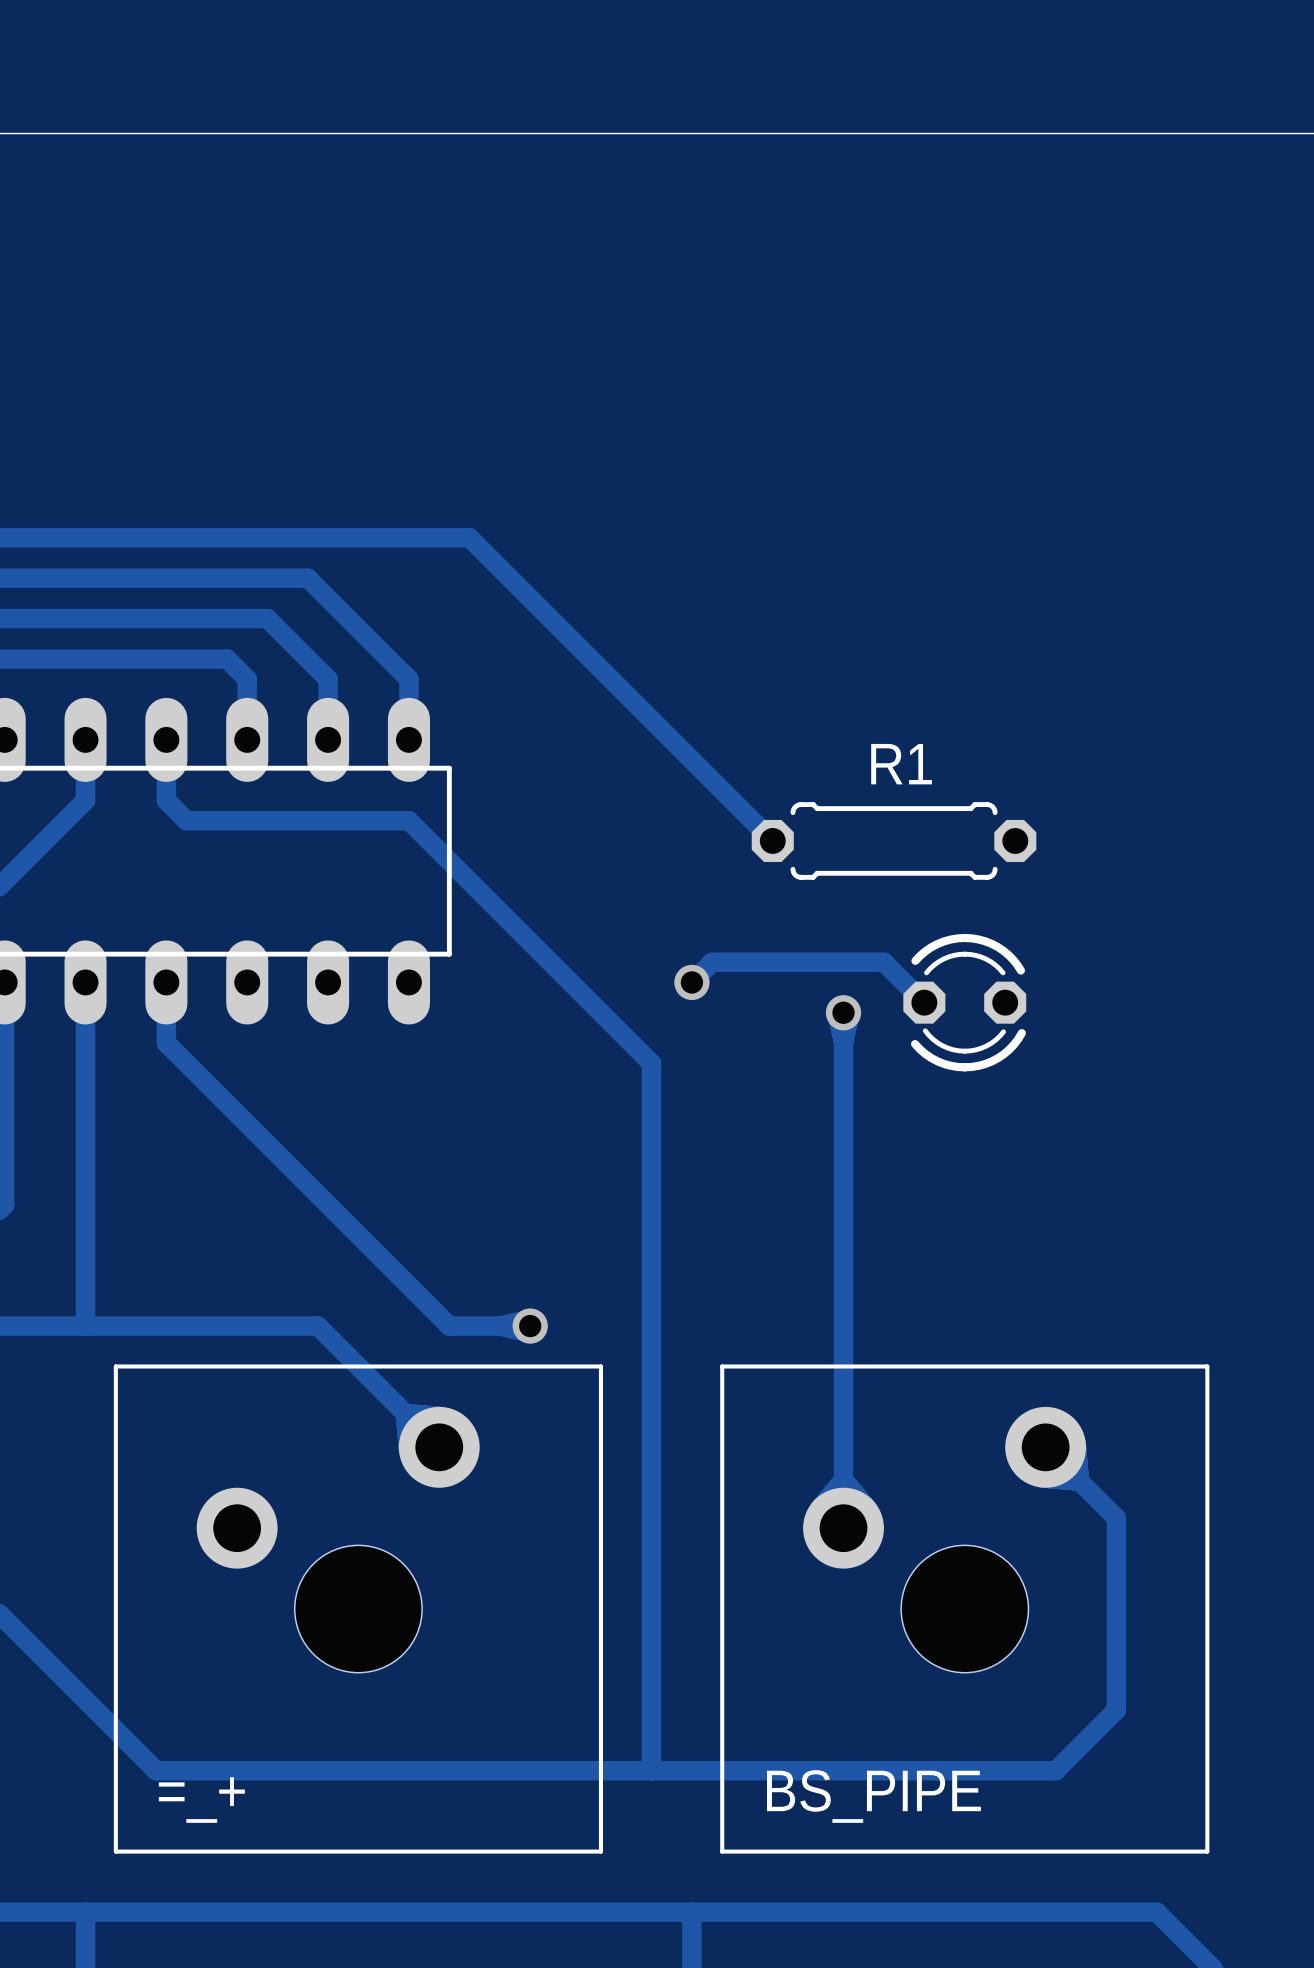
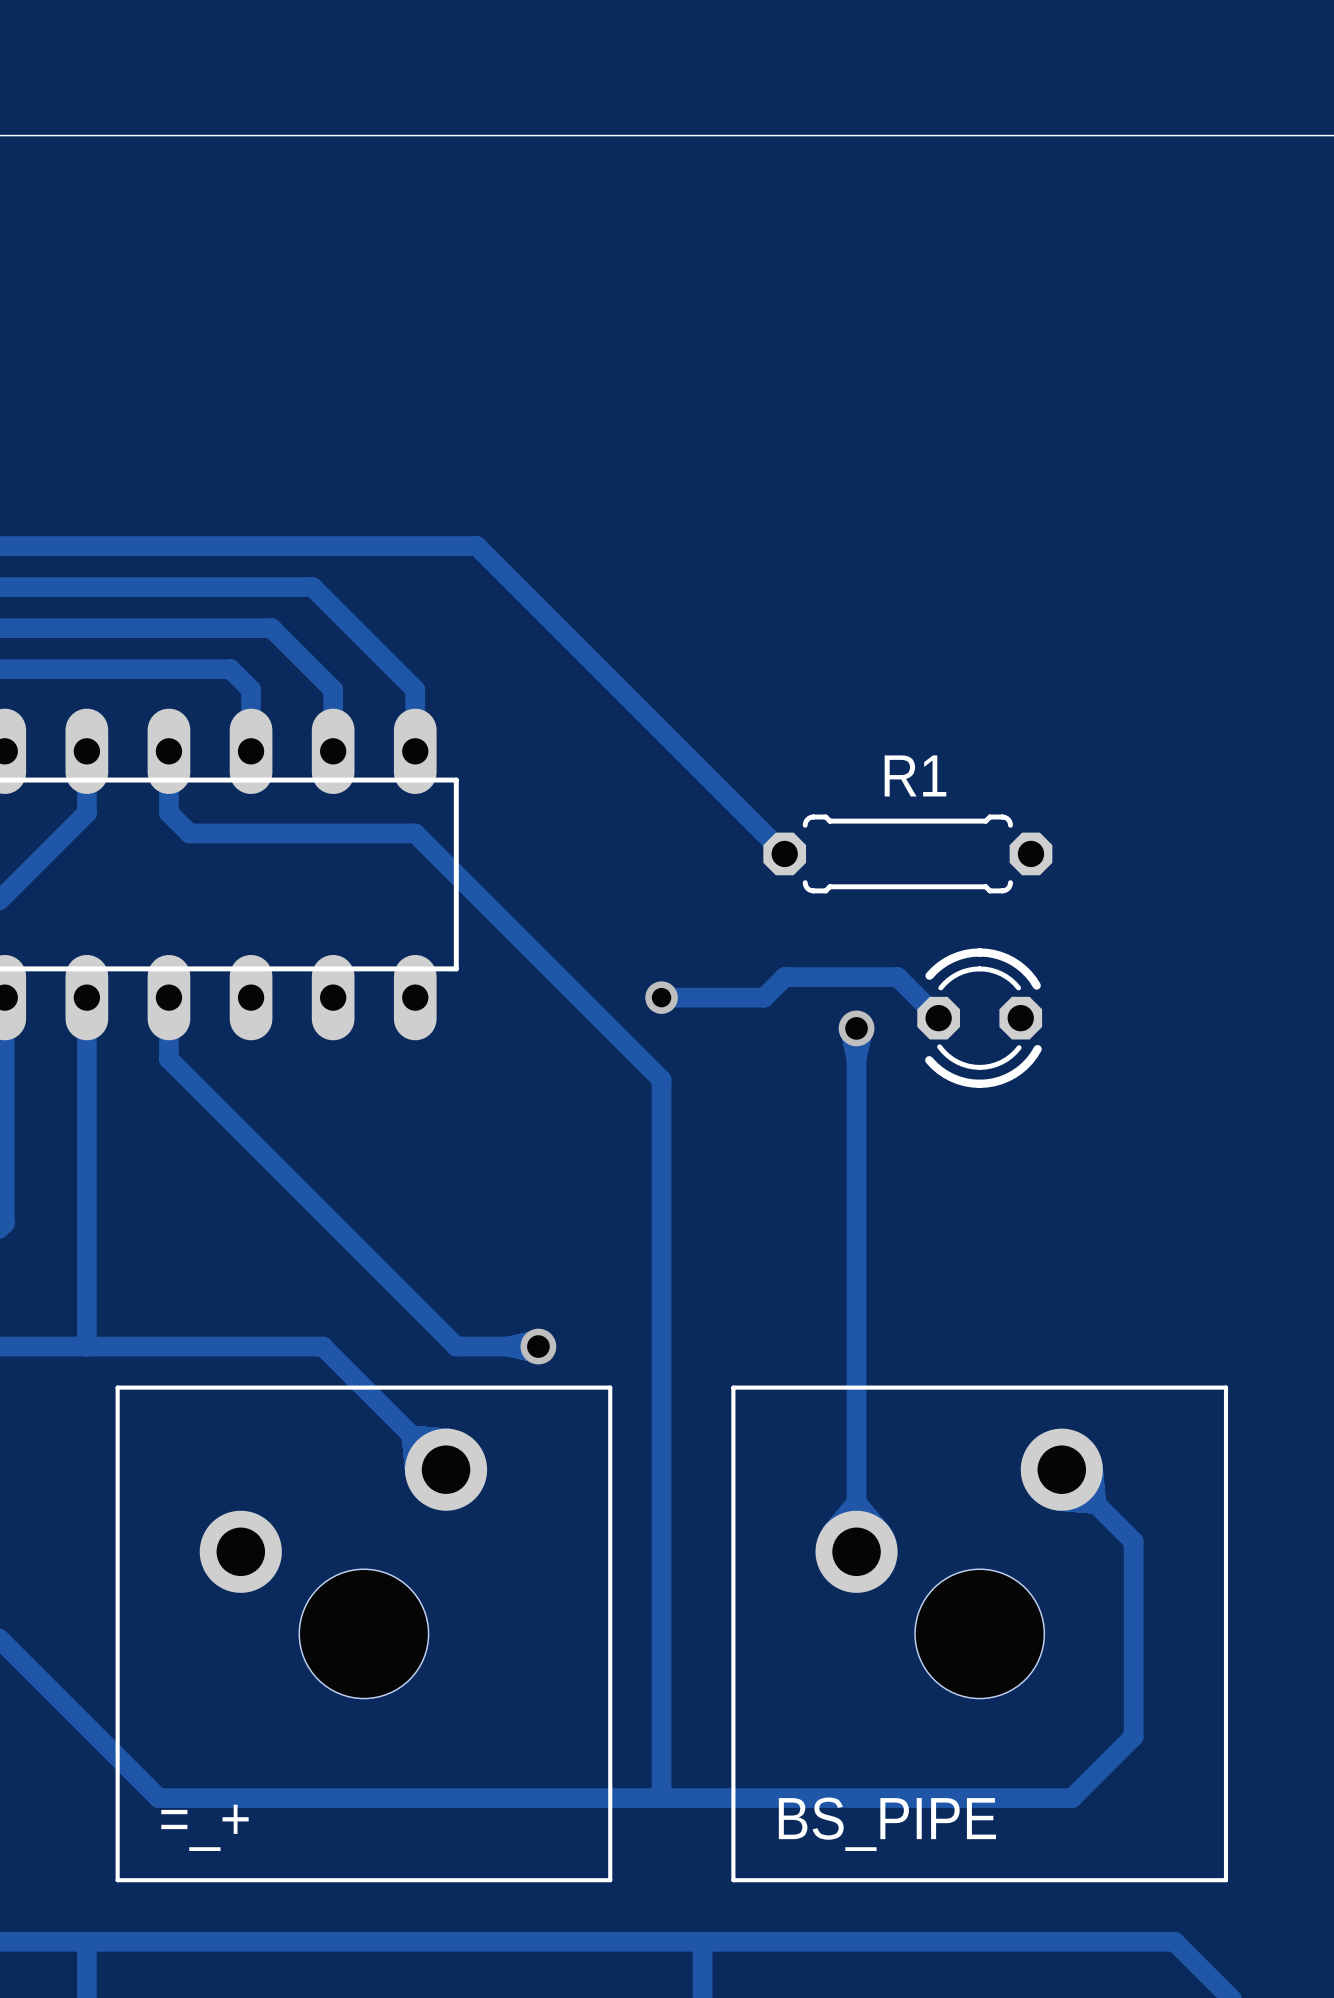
track: (772, 962) (712, 962) (691, 982) -> (784, 977) (764, 997) (661, 997)
via: none -> (661, 997)
via: (691, 982) -> none

